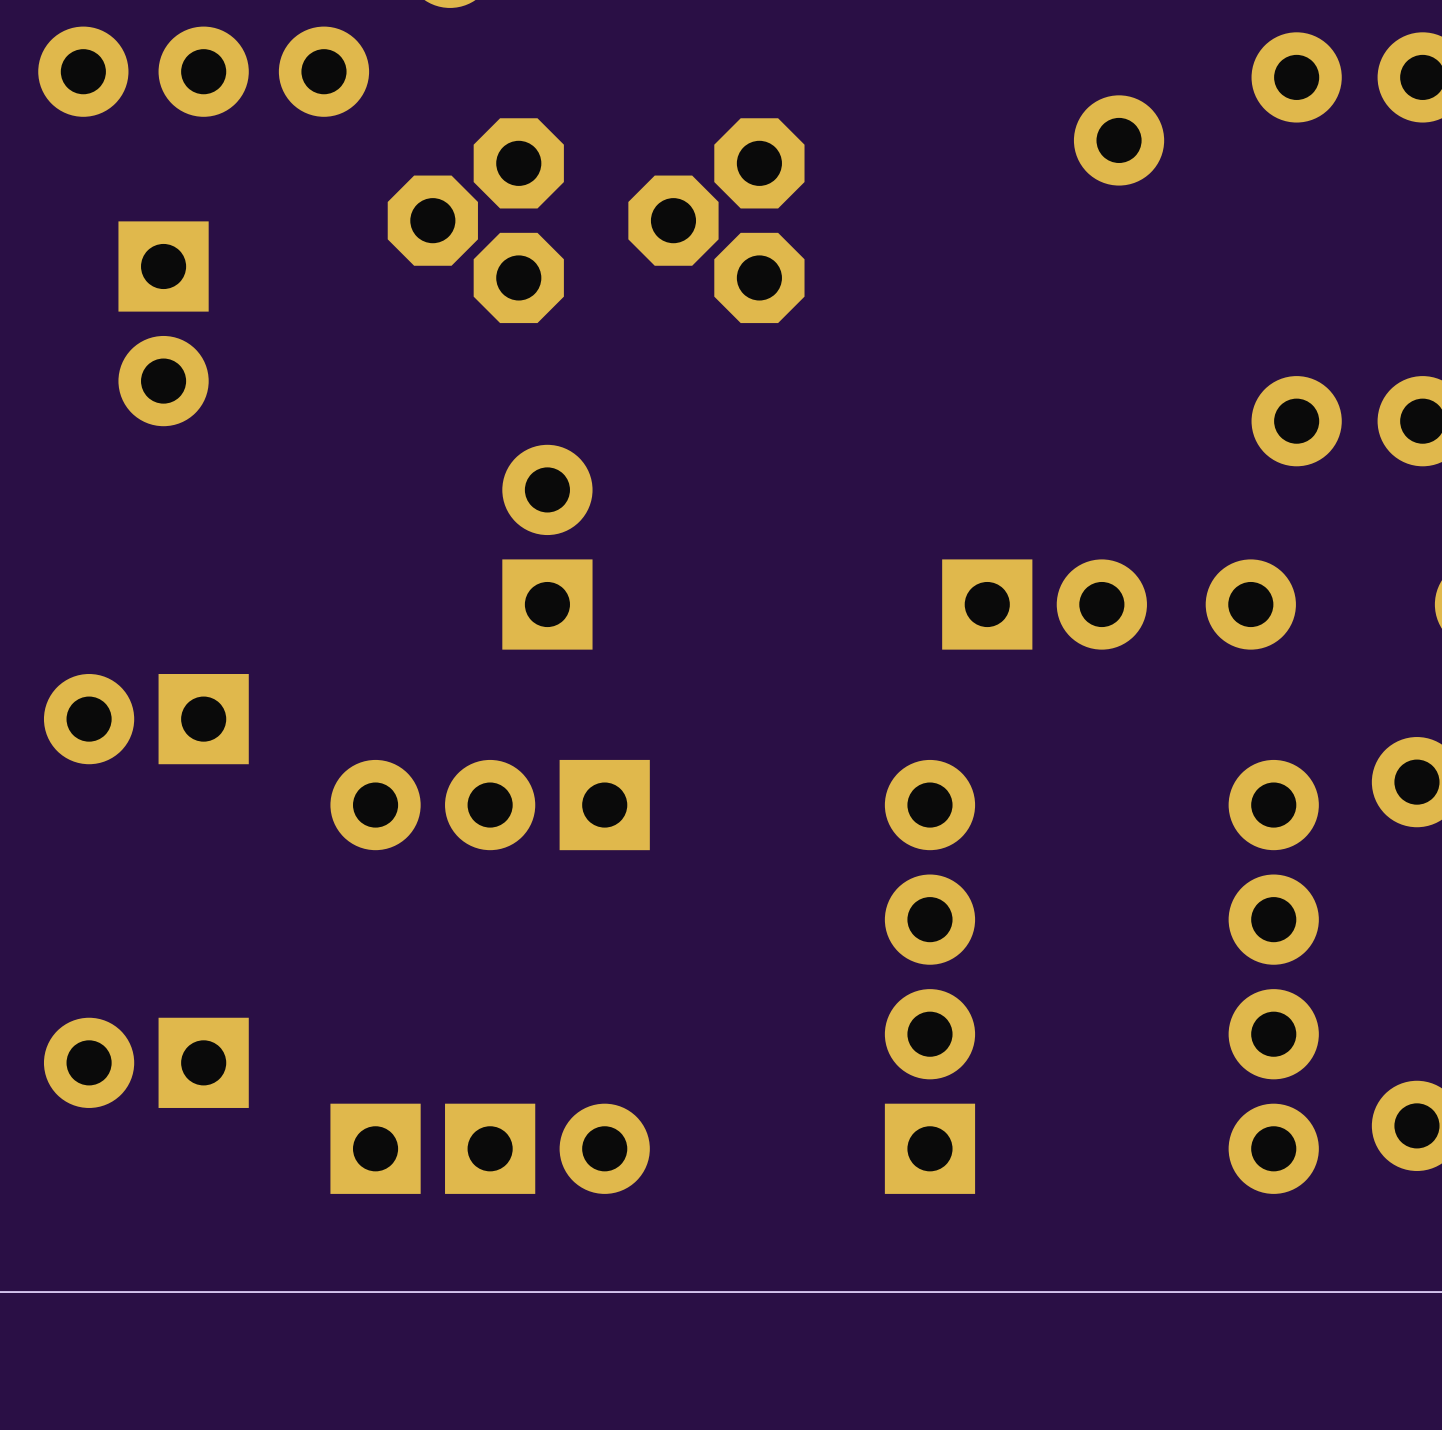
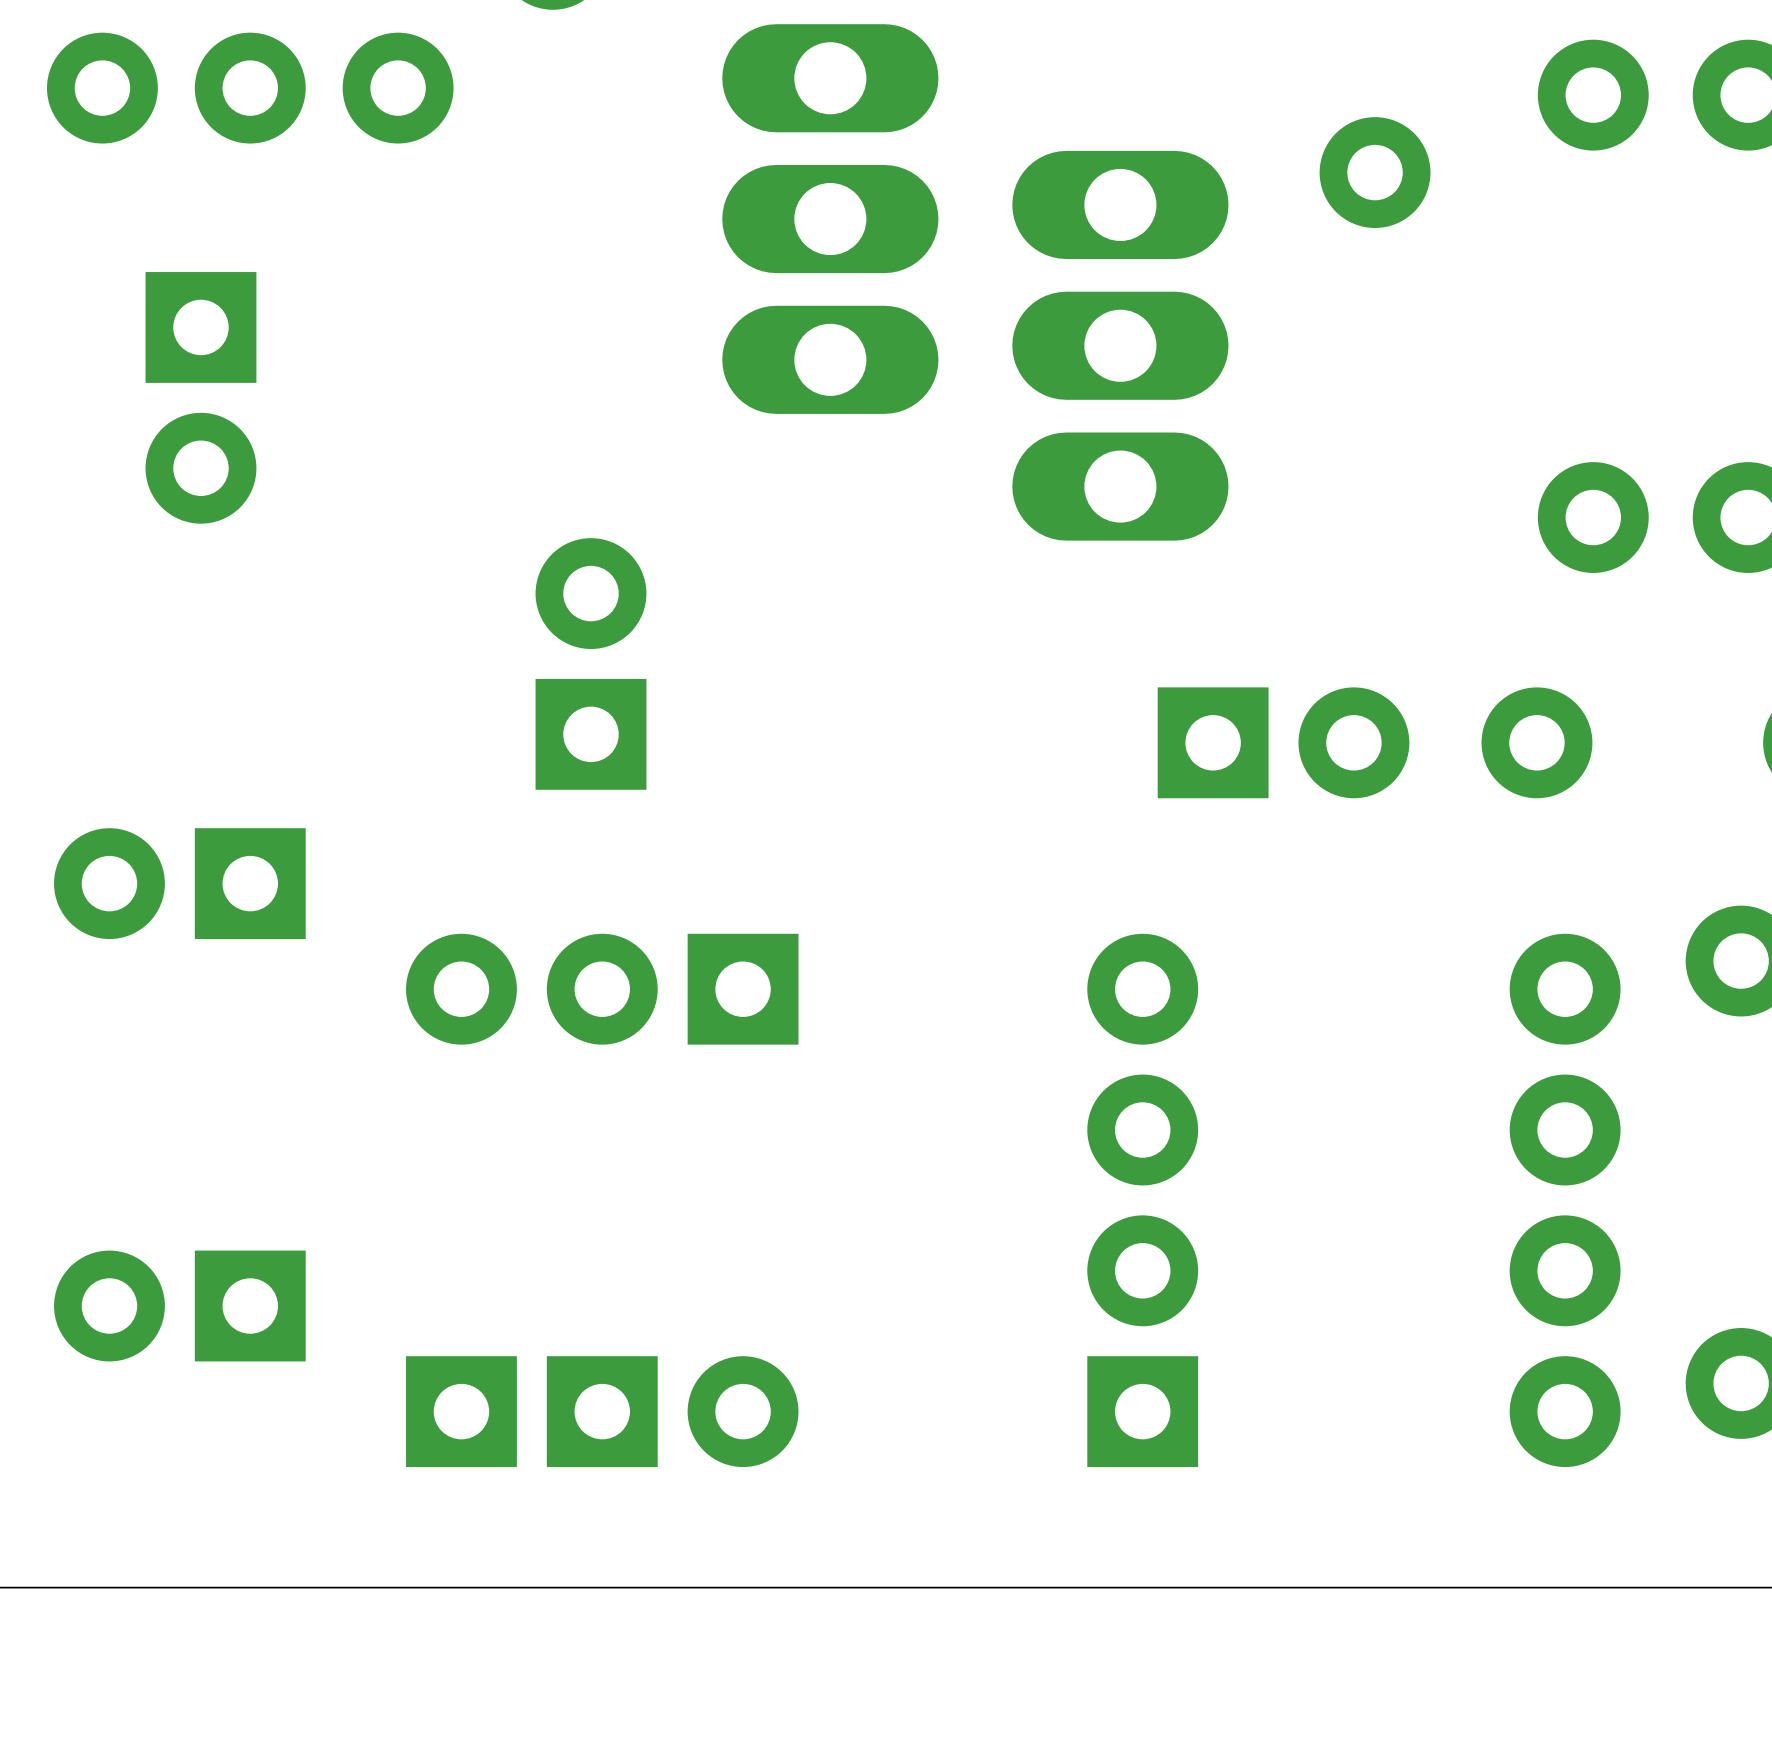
part: none -> (830, 219)
part: (475, 220) -> none
part: (716, 220) -> none
part: none -> (1120, 345)
part position: (547, 547) -> (591, 663)

